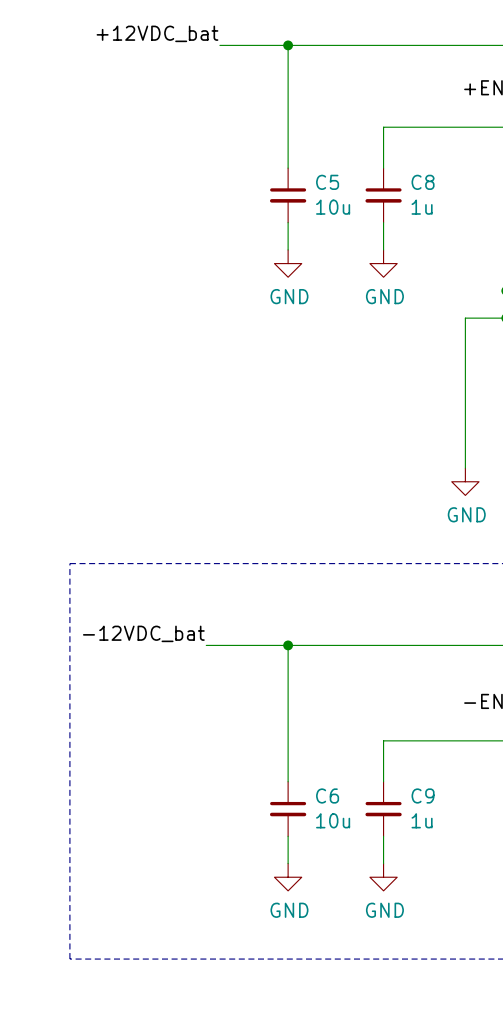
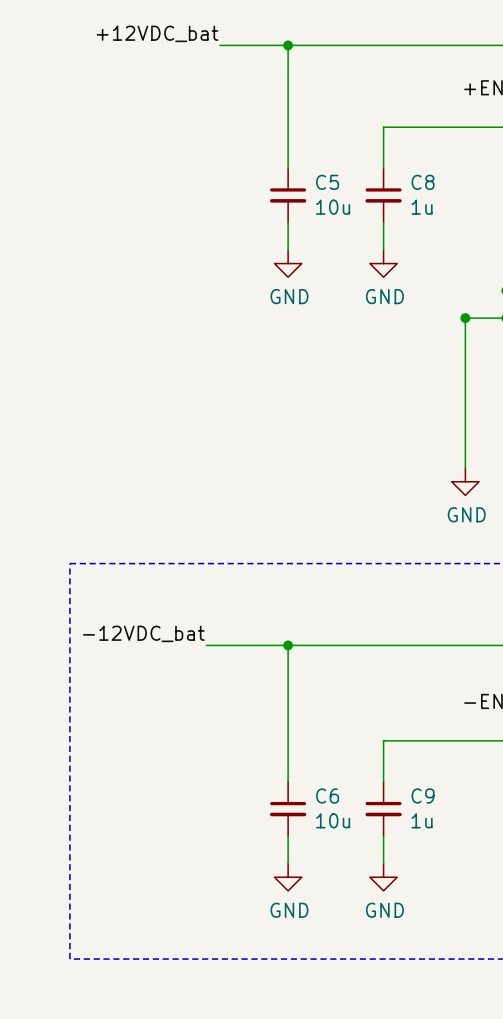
junction: none -> (465, 318)

